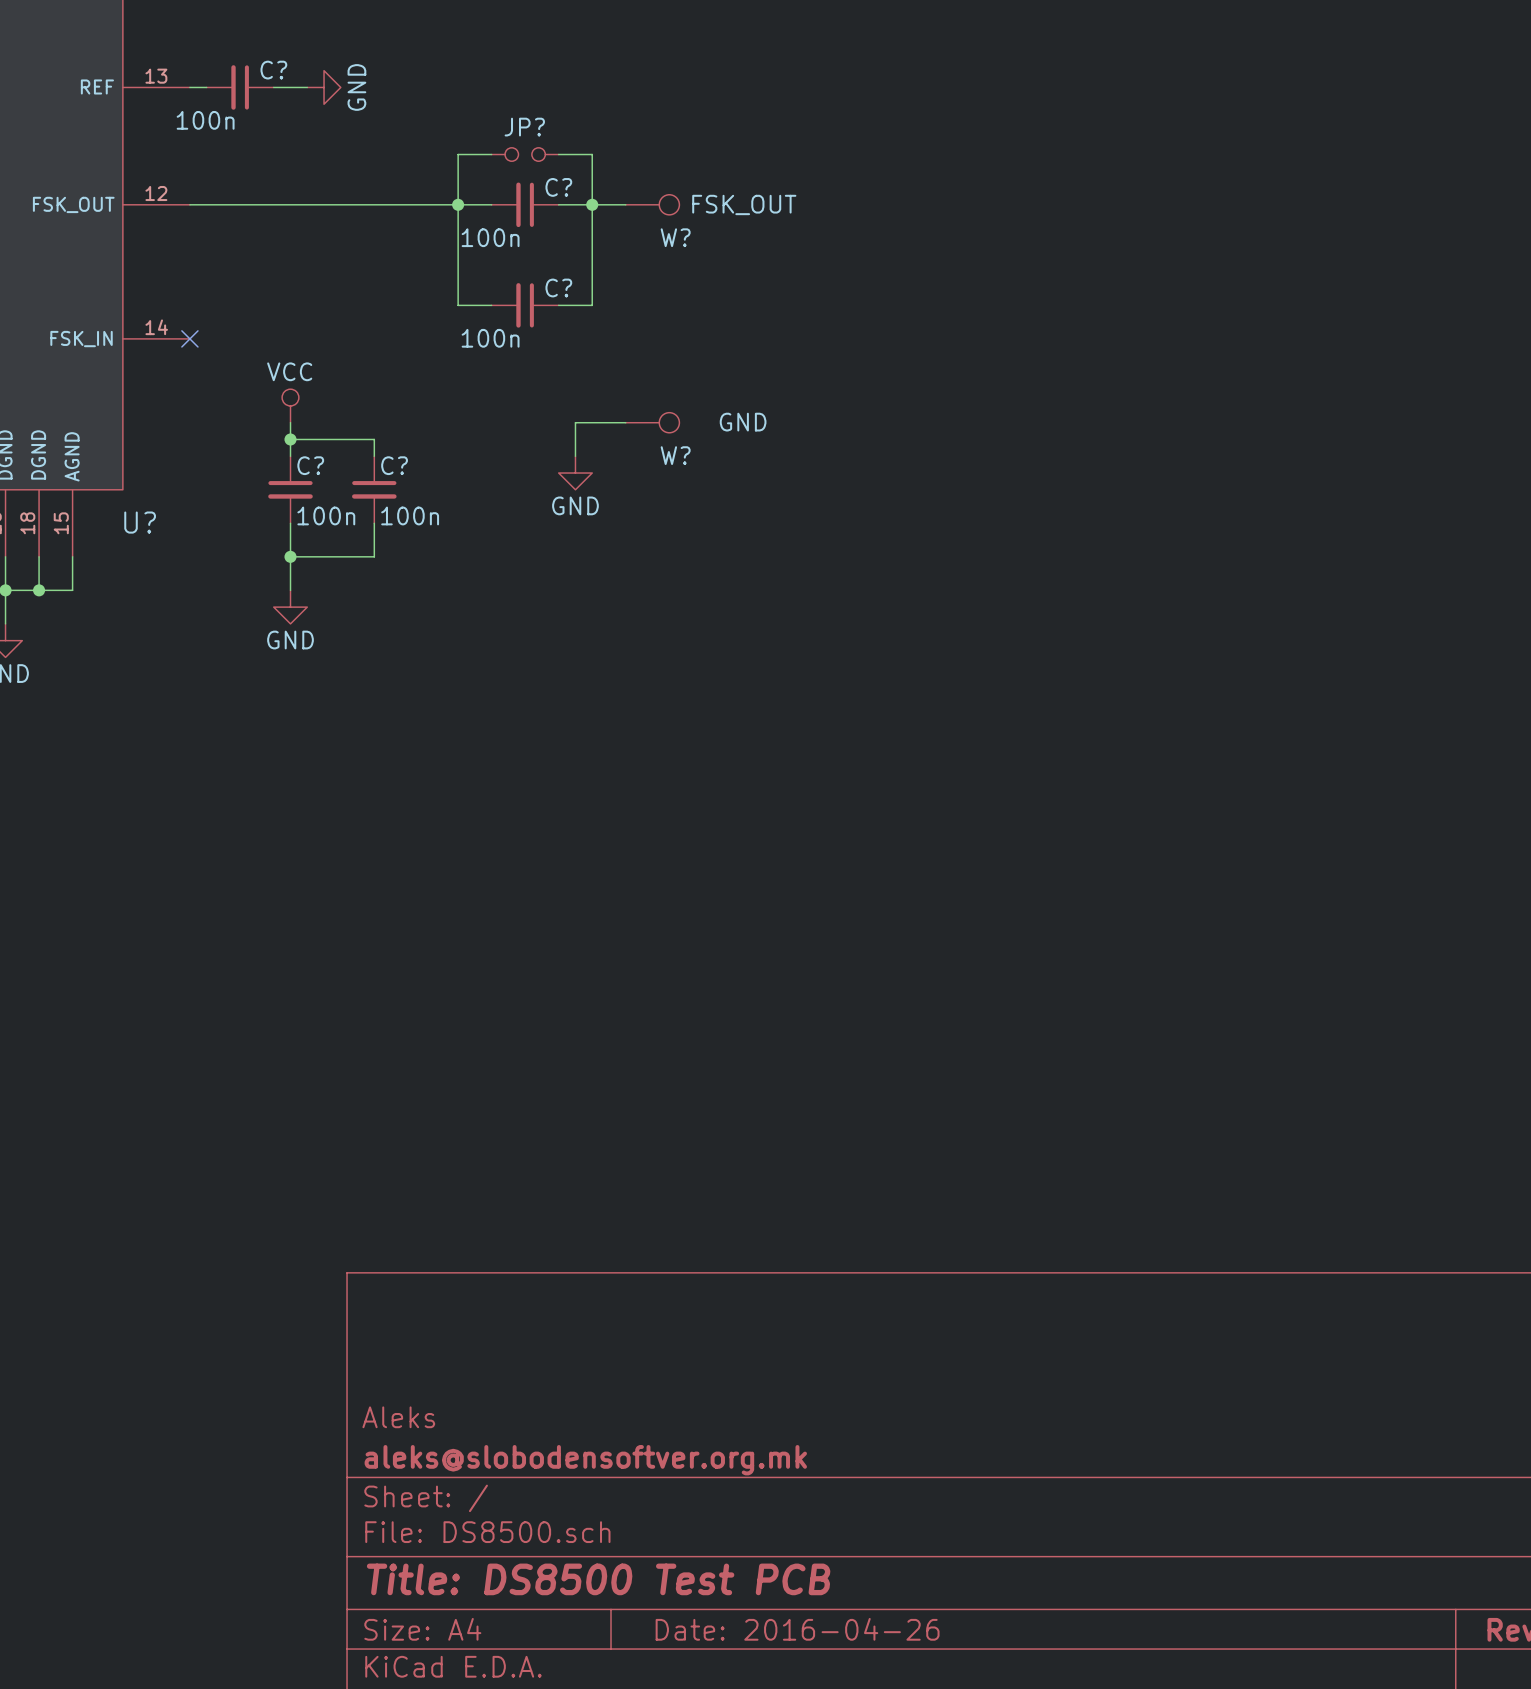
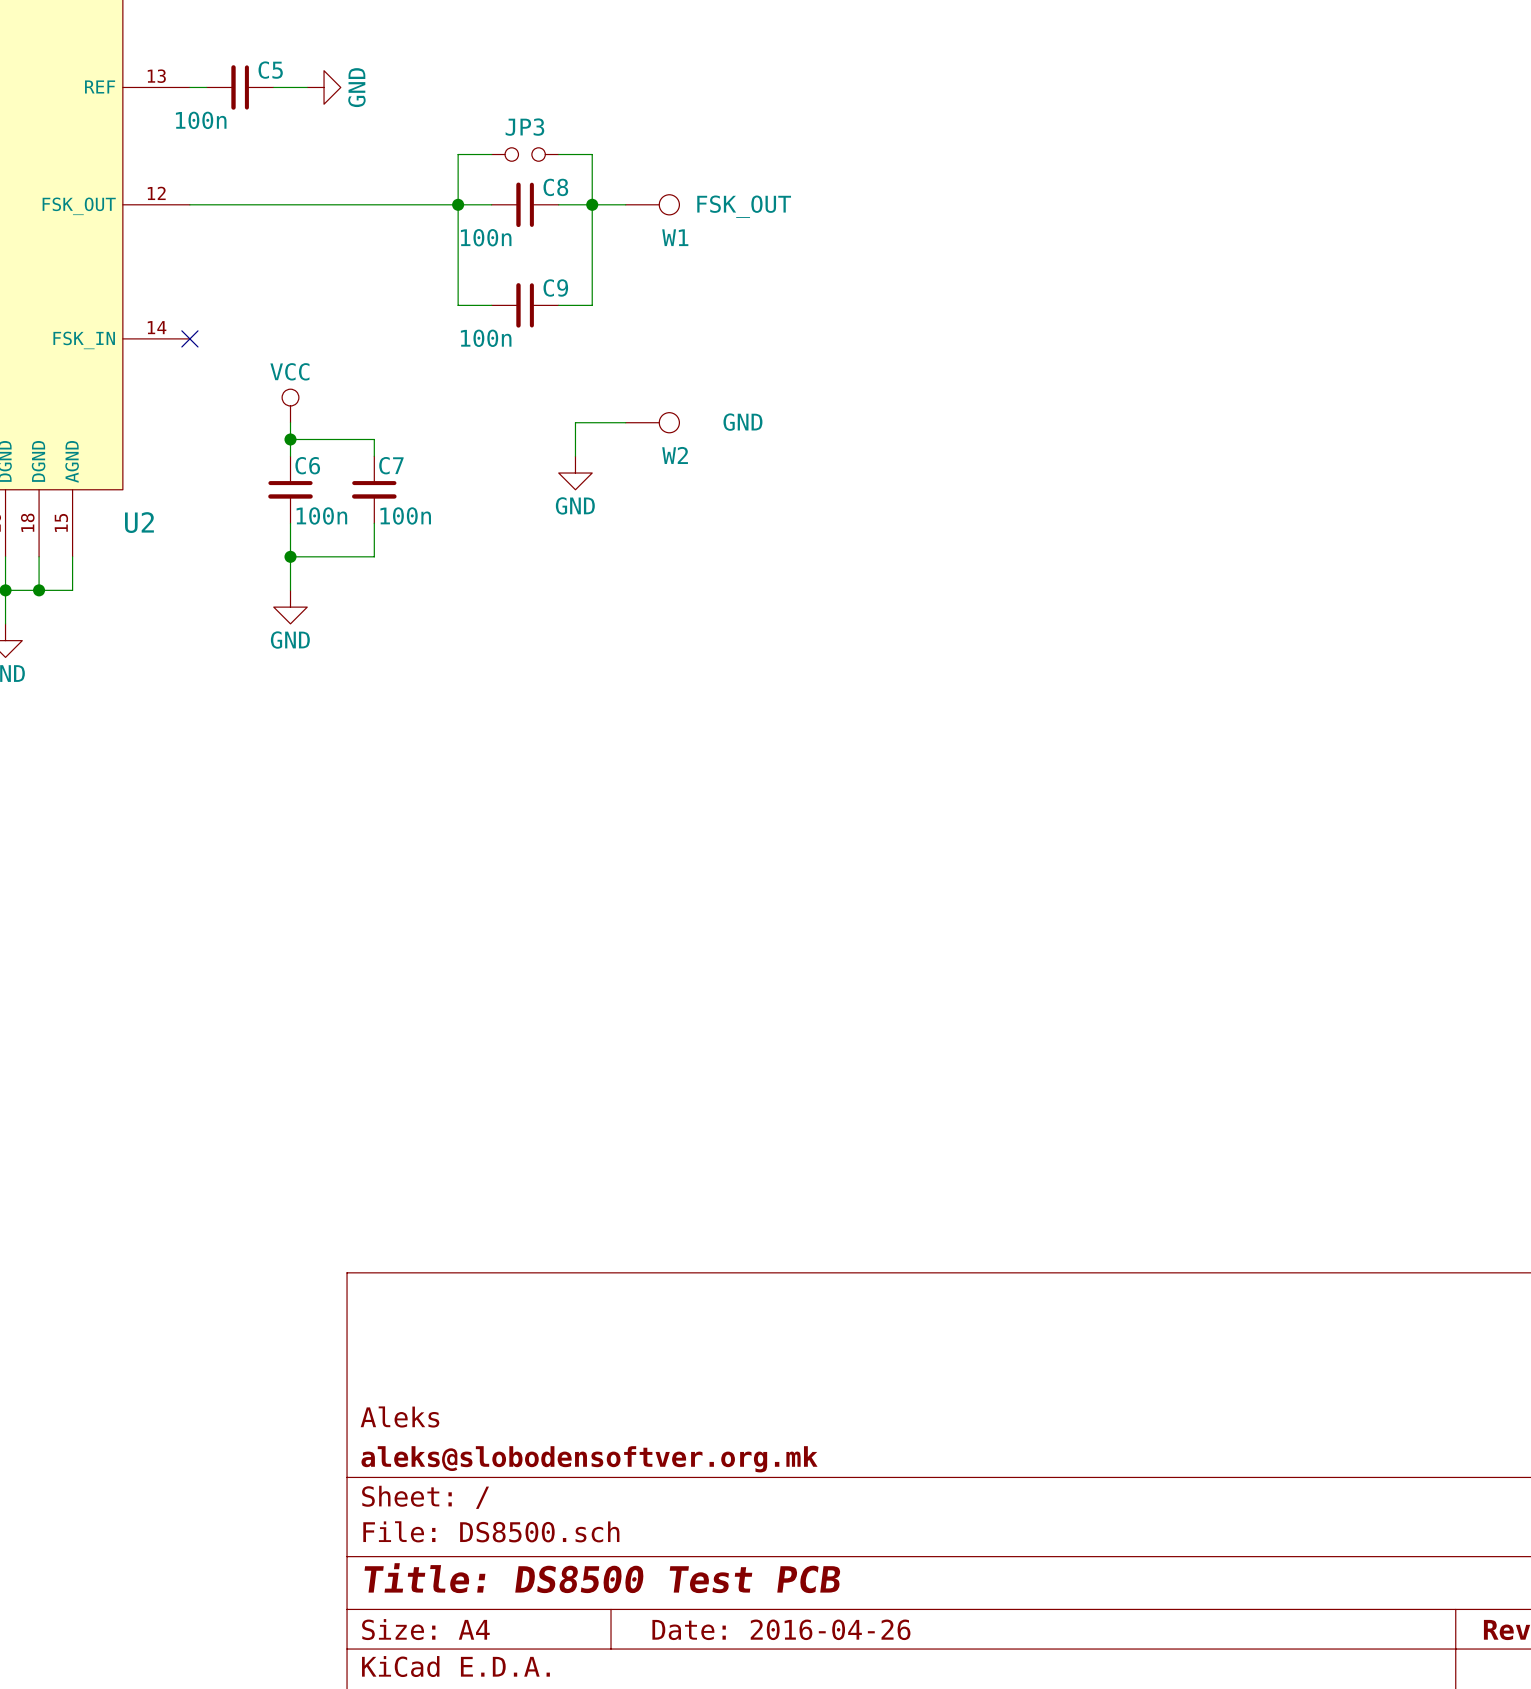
C? name: C? (273, 70) -> C5 (270, 70)
JP? name: JP? (524, 127) -> JP3 (524, 127)
C? name: C? (558, 187) -> C8 (555, 187)
W? name: W? (675, 237) -> W1 (675, 237)
C? name: C? (558, 287) -> C9 (555, 288)
W? name: W? (675, 455) -> W2 (675, 455)
C? name: C? (310, 465) -> C6 (307, 465)
C? name: C? (394, 465) -> C7 (391, 465)
U? name: U? (140, 522) -> U2 (139, 522)

